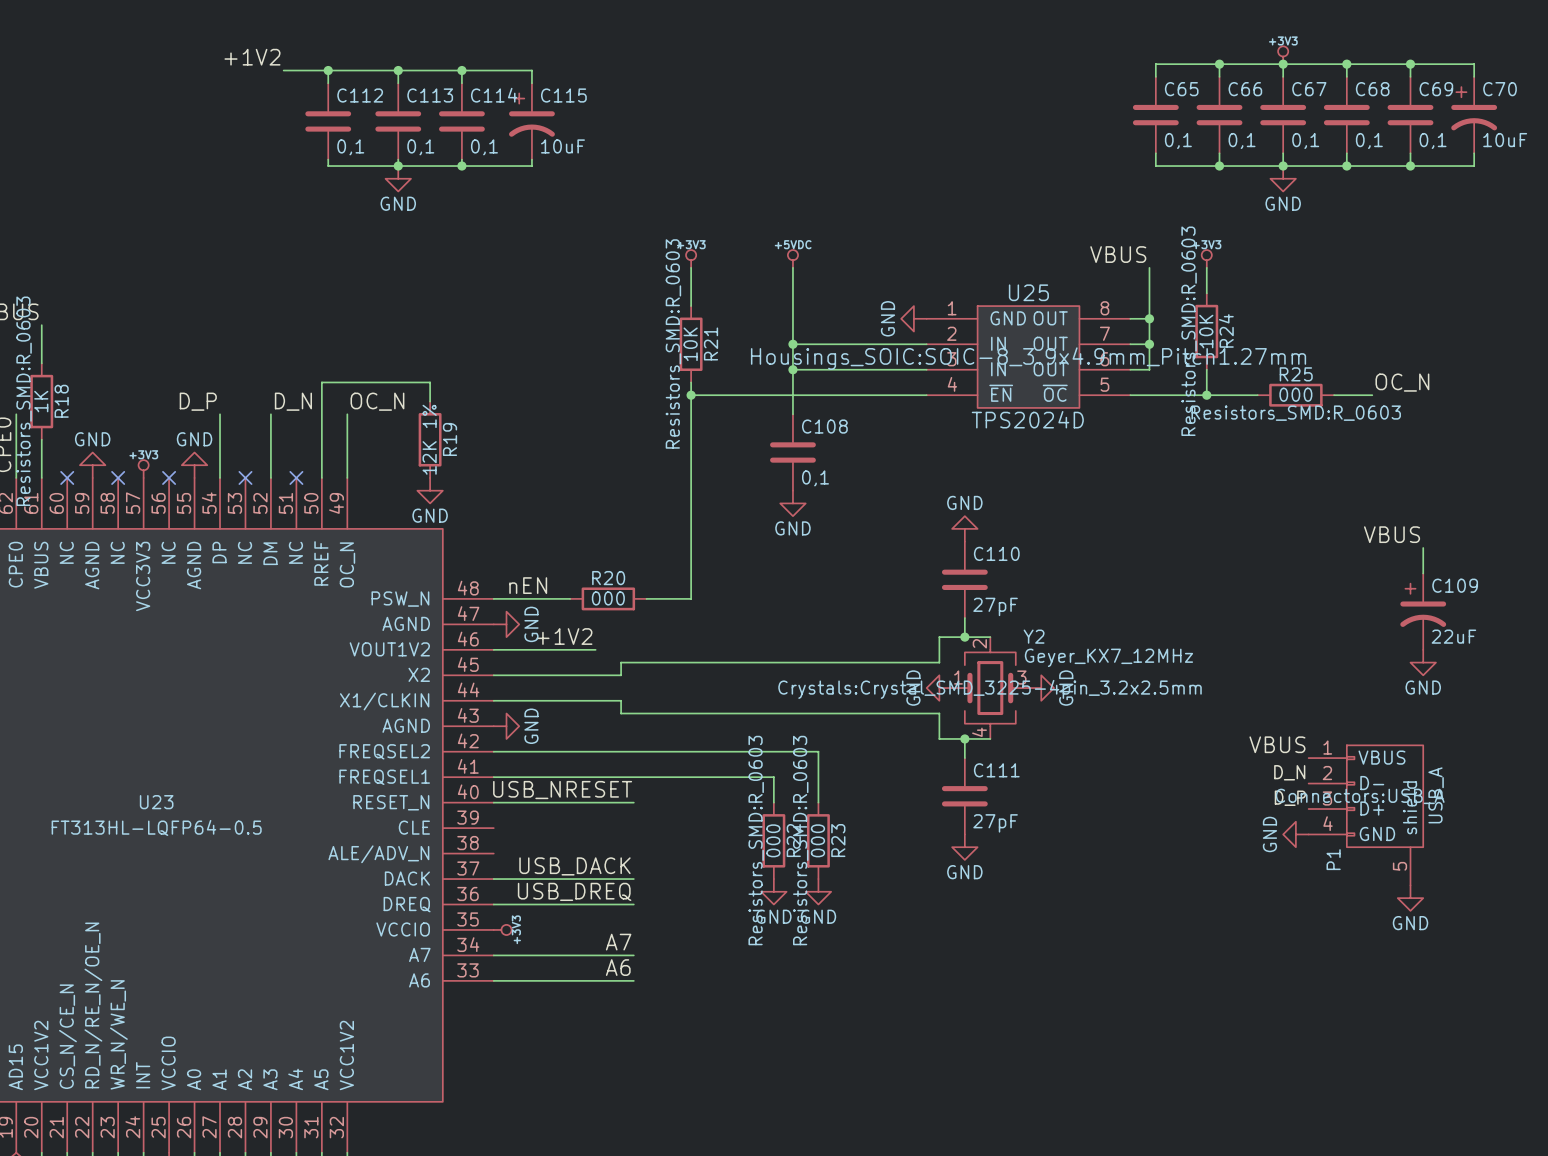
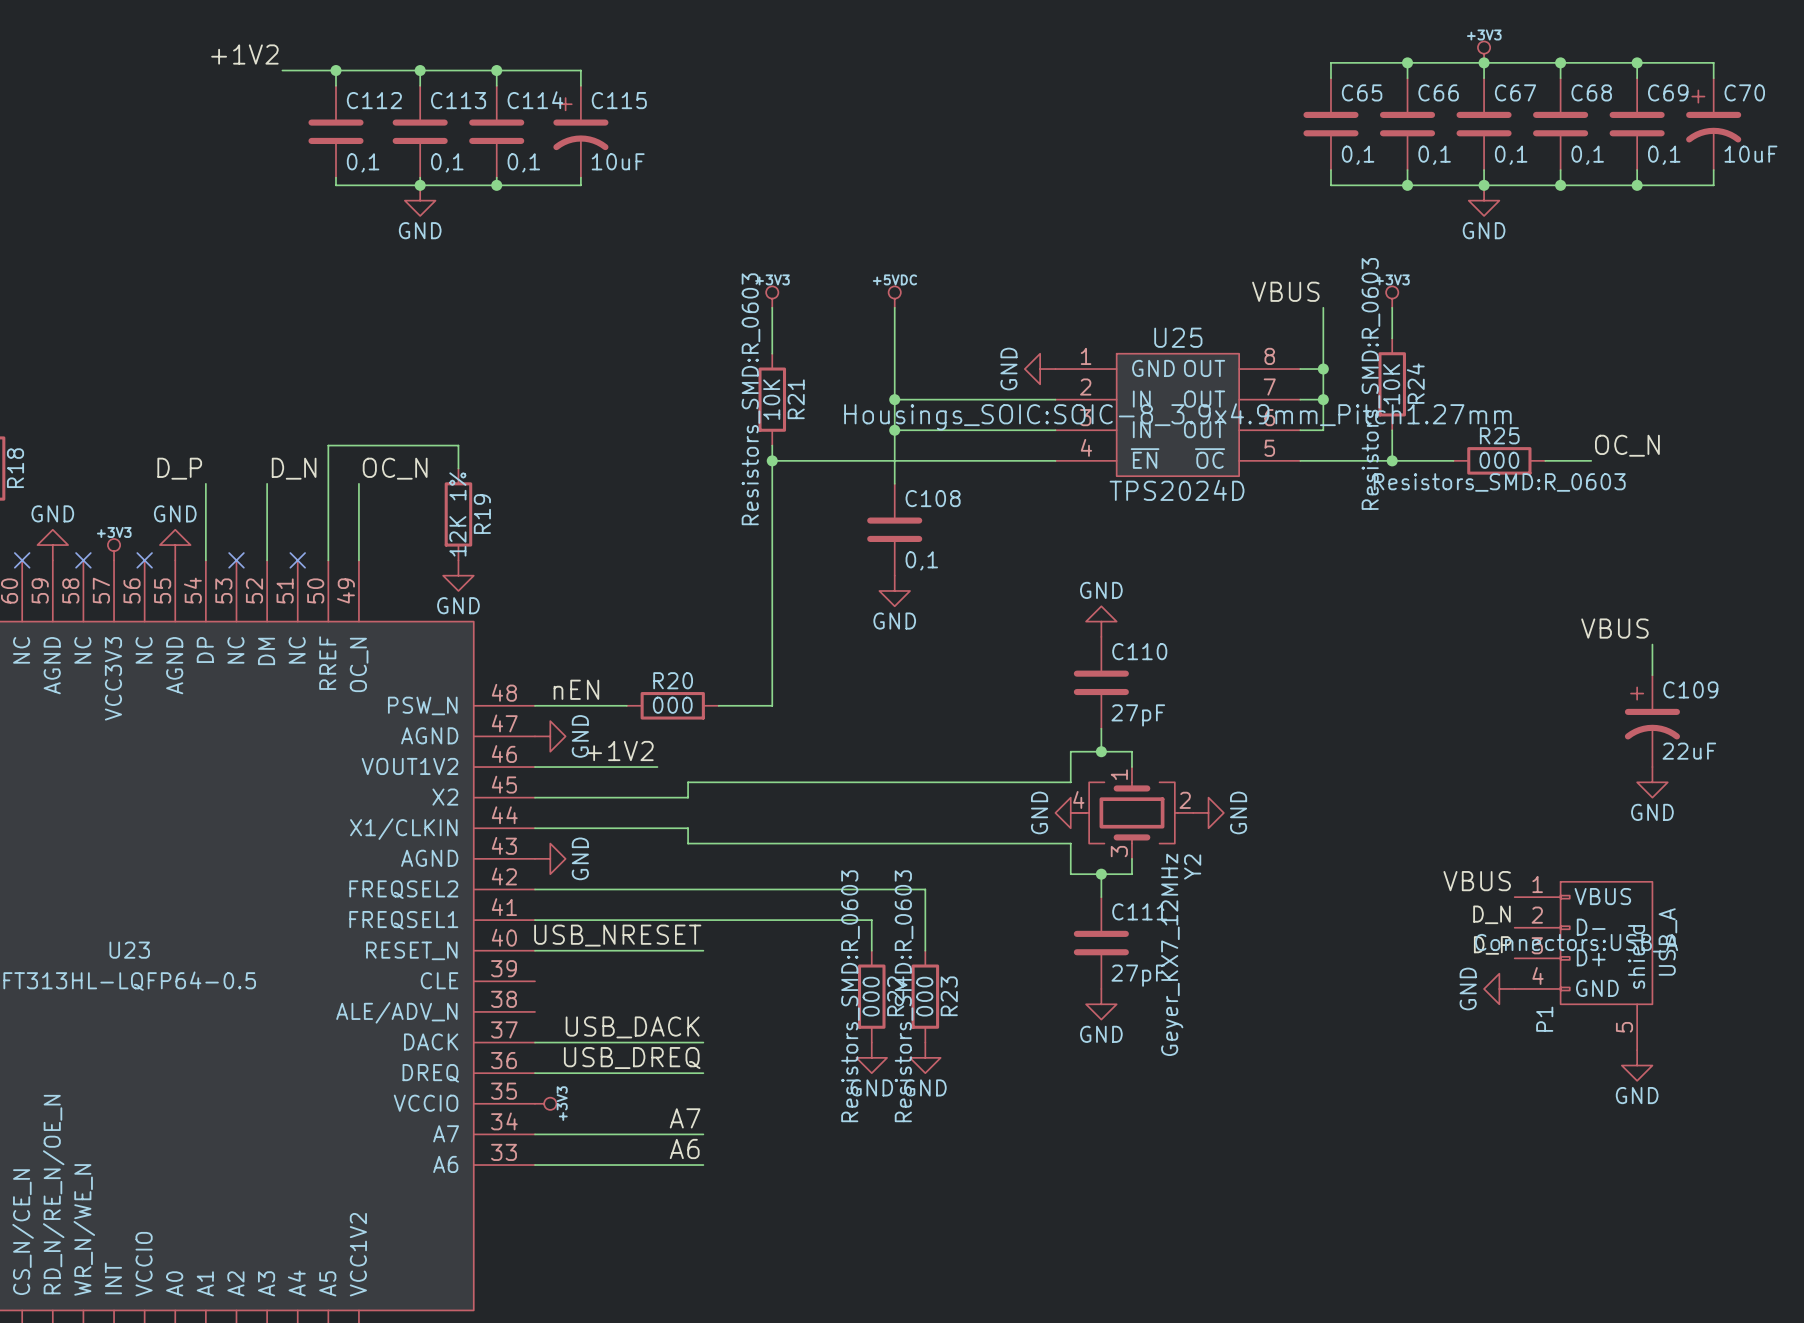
Y2 rotation: 0° (990, 688) -> 90° clockwise (1131, 812)
power symbol position: GND (1041, 688) -> GND (1208, 812)
Y2 text: Crystals:Crystal_SMD_3225-4pin_3.2x2.5mm (990, 689) -> none

